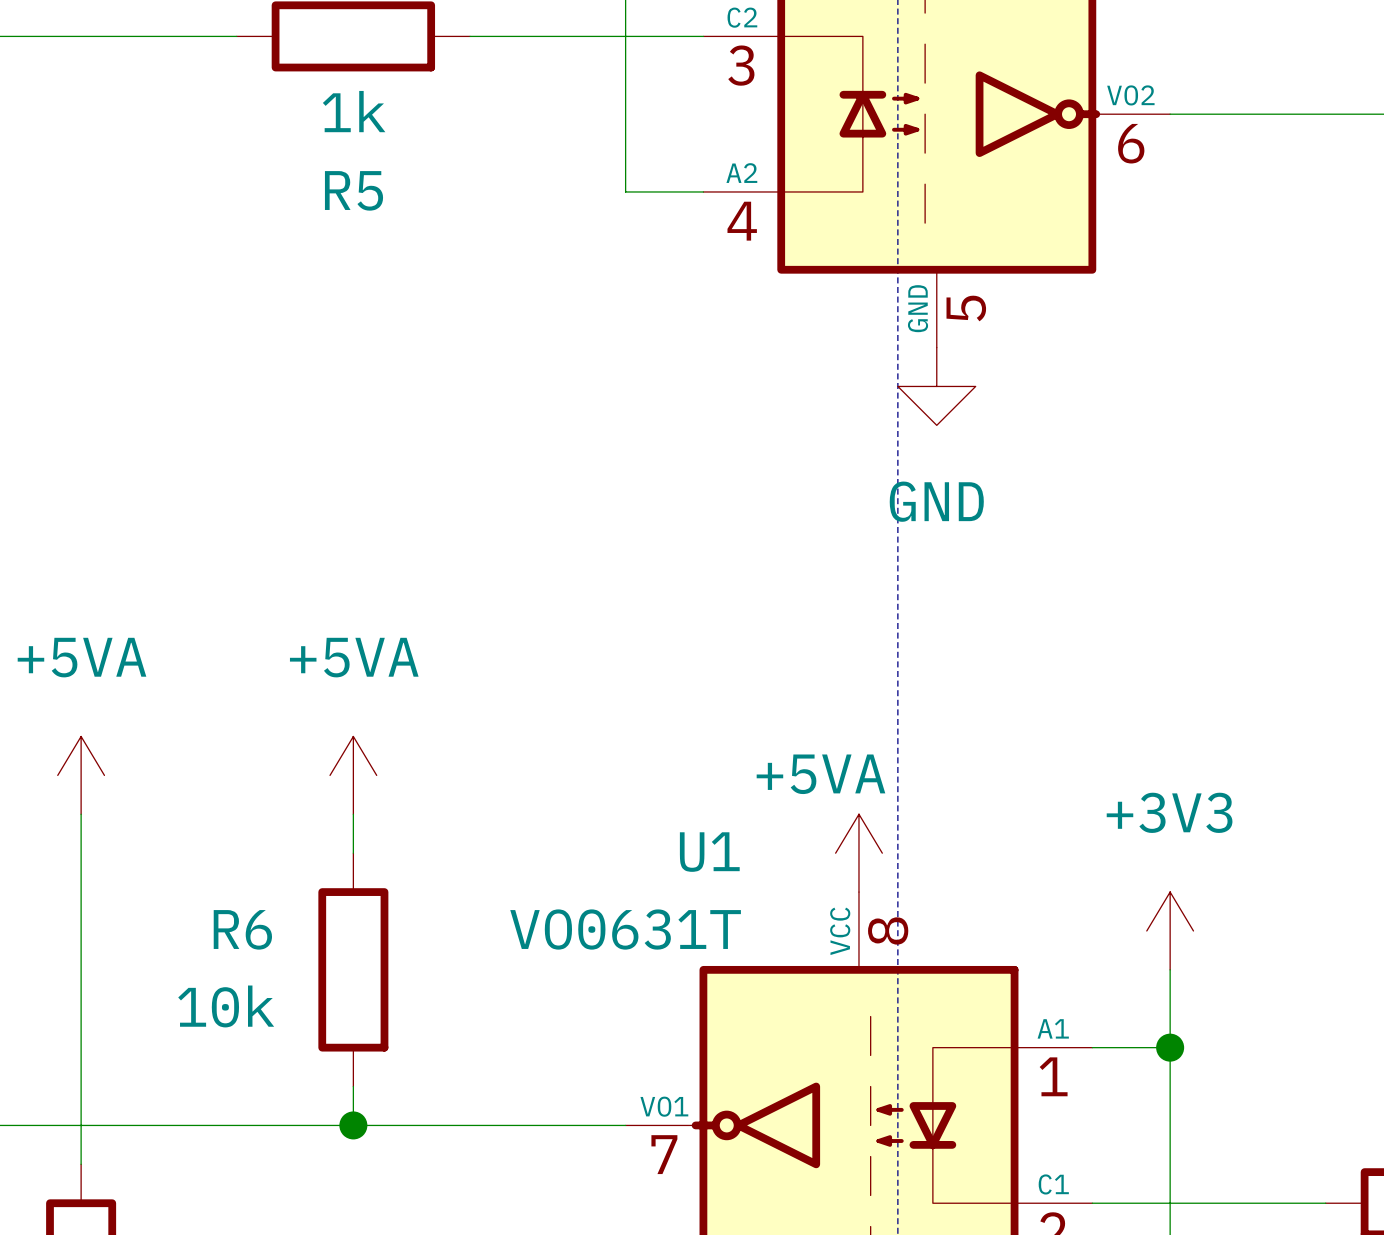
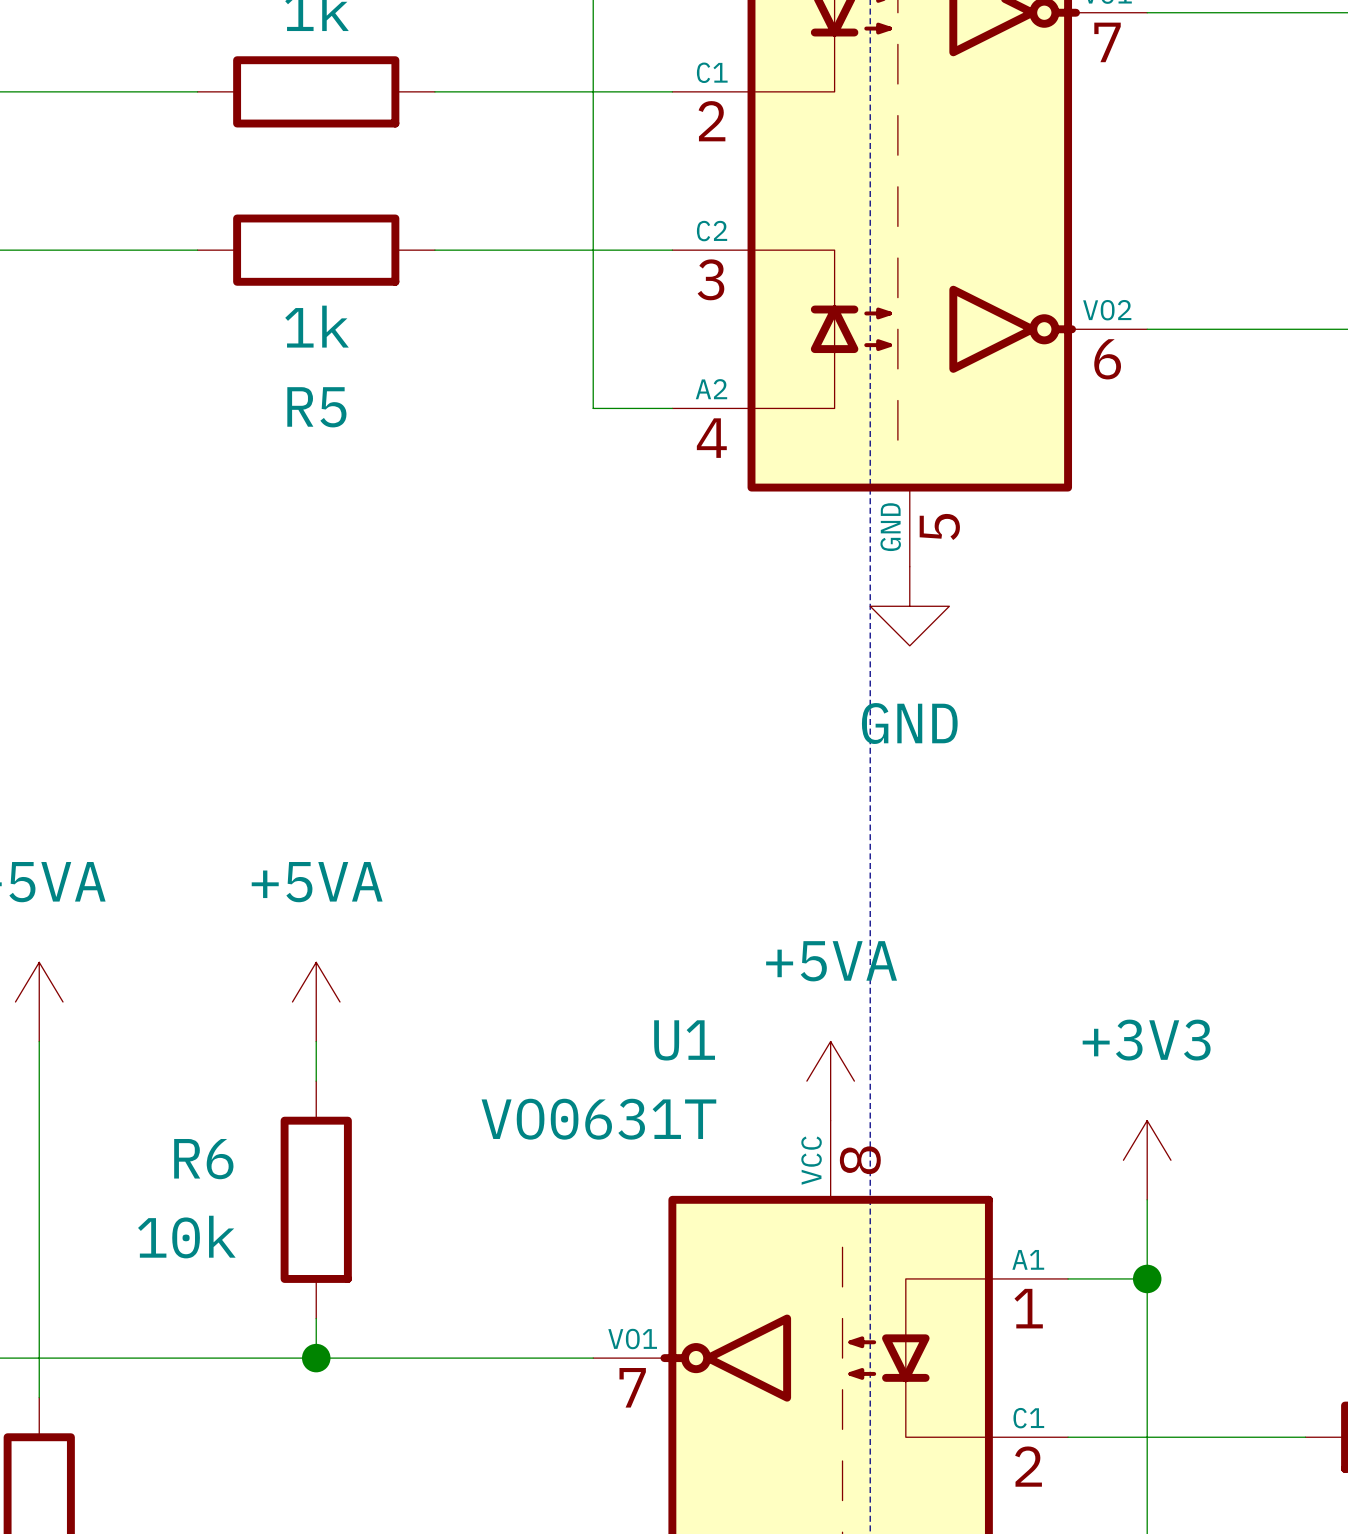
power symbol text position: +5VA (820, 774) -> +5VA (831, 961)
U1 name position: U1 (709, 852) -> U1 (684, 1040)
U1 value position: VO0631T (625, 929) -> VO0631T (598, 1119)

